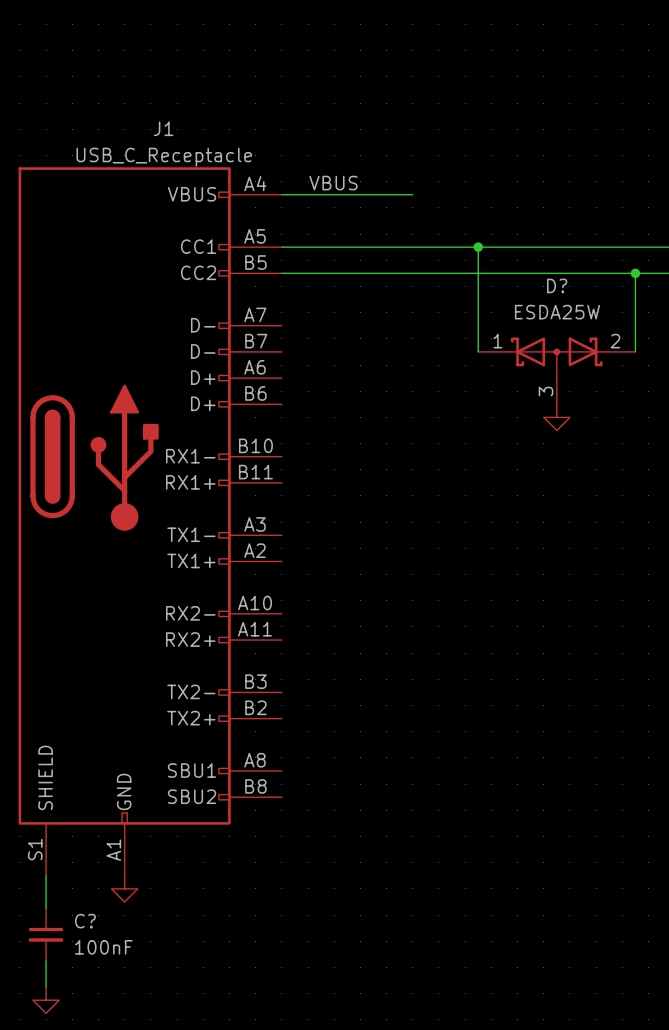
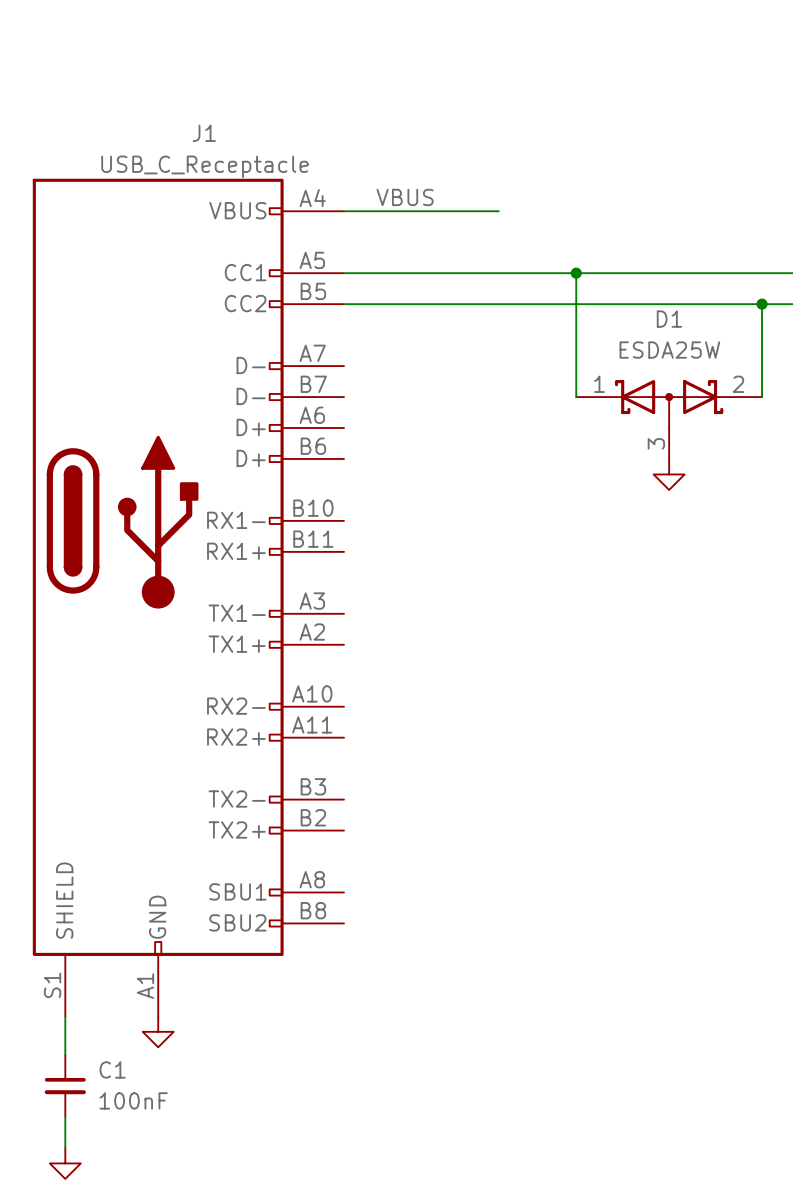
D? name: D? (557, 285) -> D1 (669, 319)
C? name: C? (85, 921) -> C1 (112, 1069)

